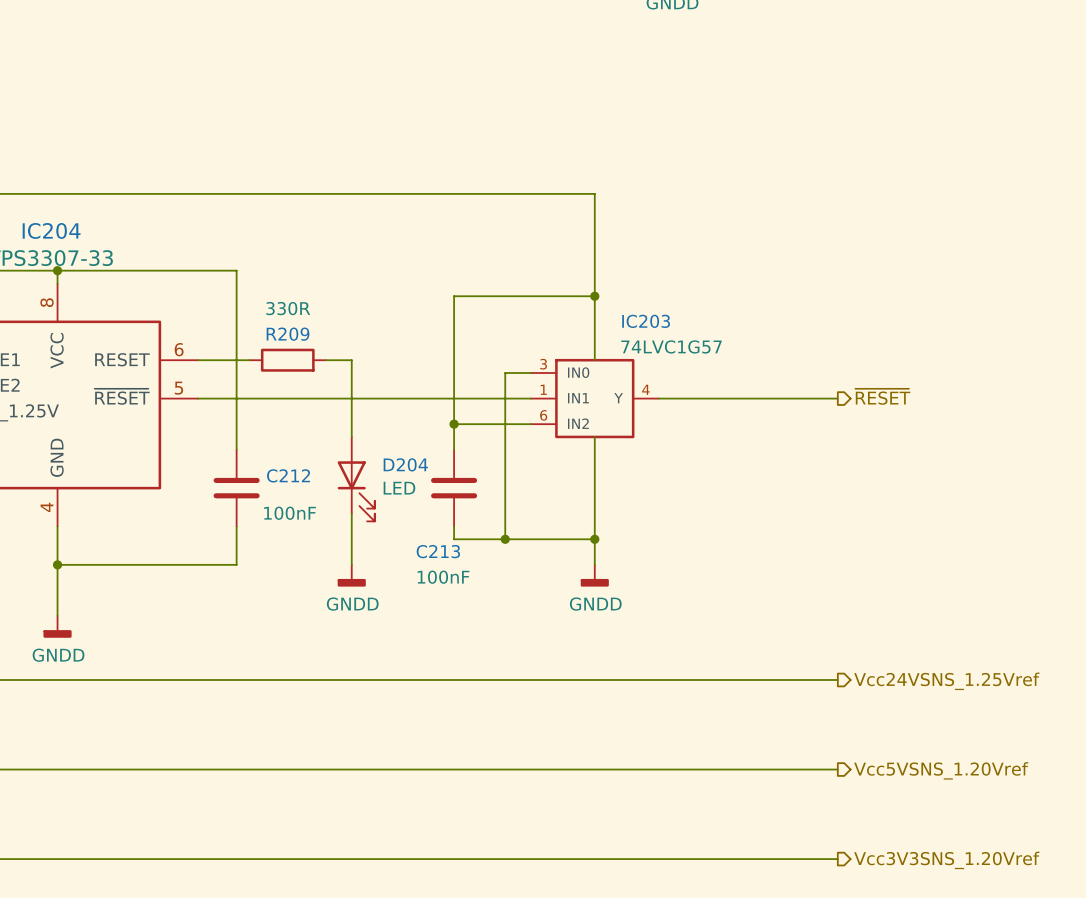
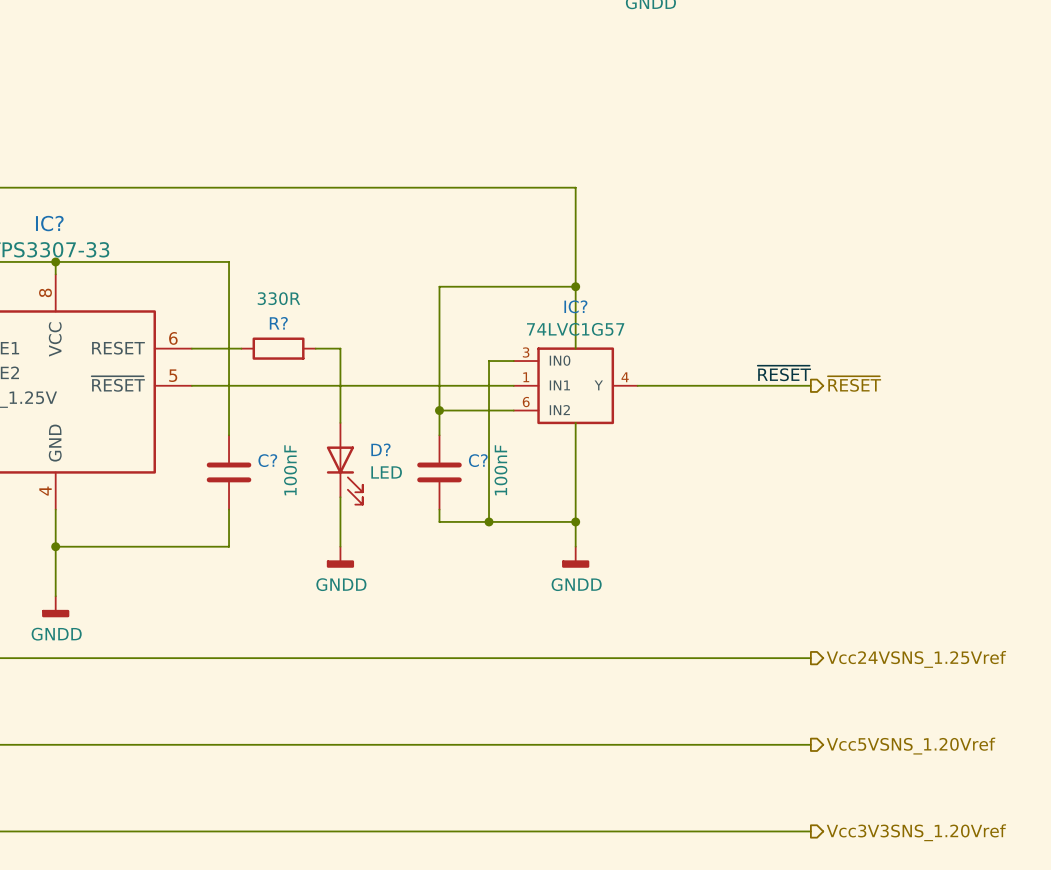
IC204 name: IC204 (51, 230) -> IC? (49, 223)
IC203 name: IC203 (646, 321) -> IC? (575, 306)
R209 name: R209 (288, 334) -> R? (278, 323)
IC203 value position: 74LVC1G57 (671, 346) -> 74LVC1G57 (575, 329)
label: none -> ~{RESET} (784, 373)
D204 name: D204 (405, 464) -> D? (380, 449)
C212 name: C212 (288, 475) -> C? (267, 460)
C212 value rotation: 0° (290, 513) -> 90° counterclockwise (290, 470)
C213 name: C213 (438, 551) -> C? (478, 460)
C213 value rotation: 0° (443, 577) -> 90° counterclockwise (500, 470)
C213 value position: 100nF (443, 577) -> 100nF (500, 470)

